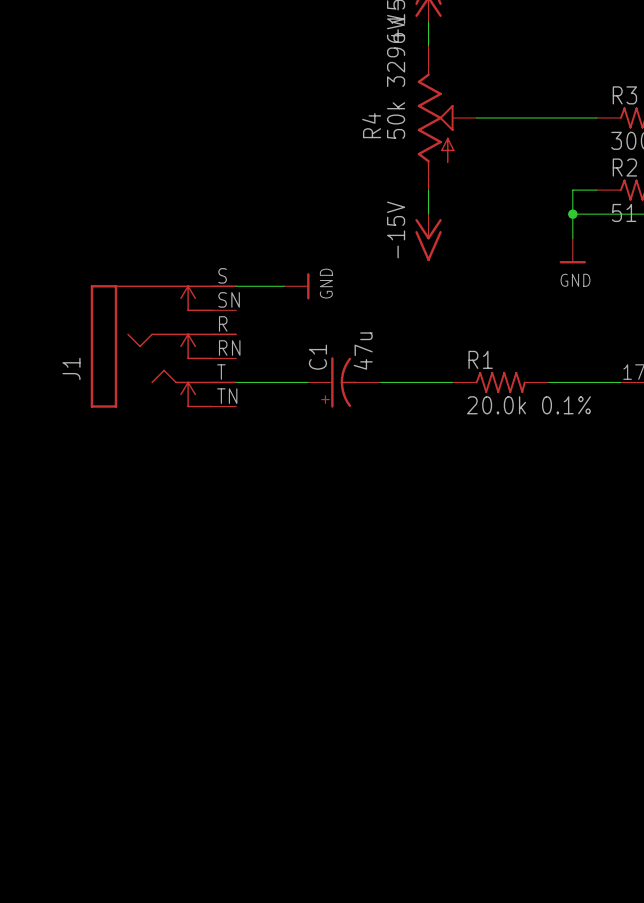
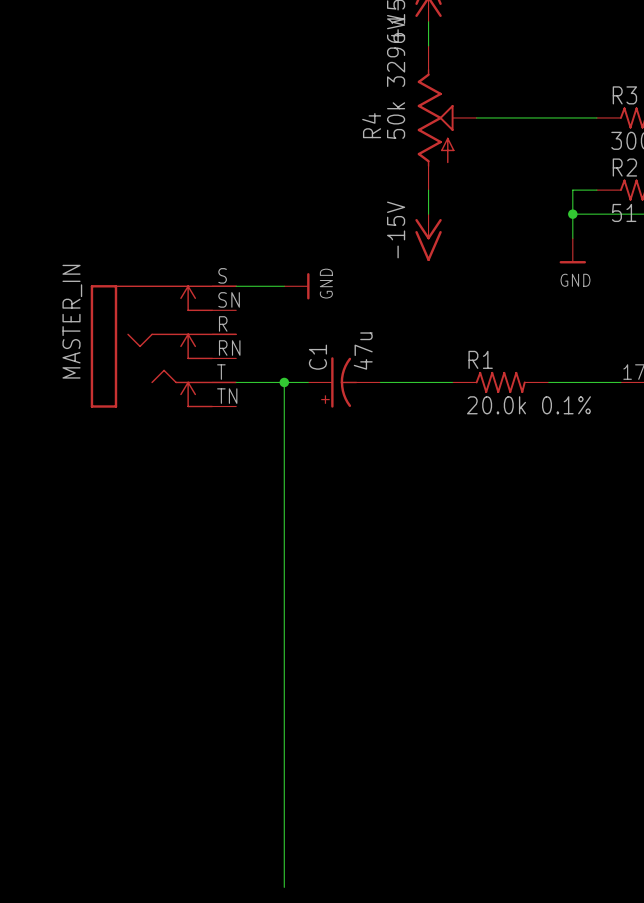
J1 name: J1 (71, 368) -> MASTER_IN (72, 321)
wire: none -> (284, 382) (284, 887)
junction: none -> (284, 382)

